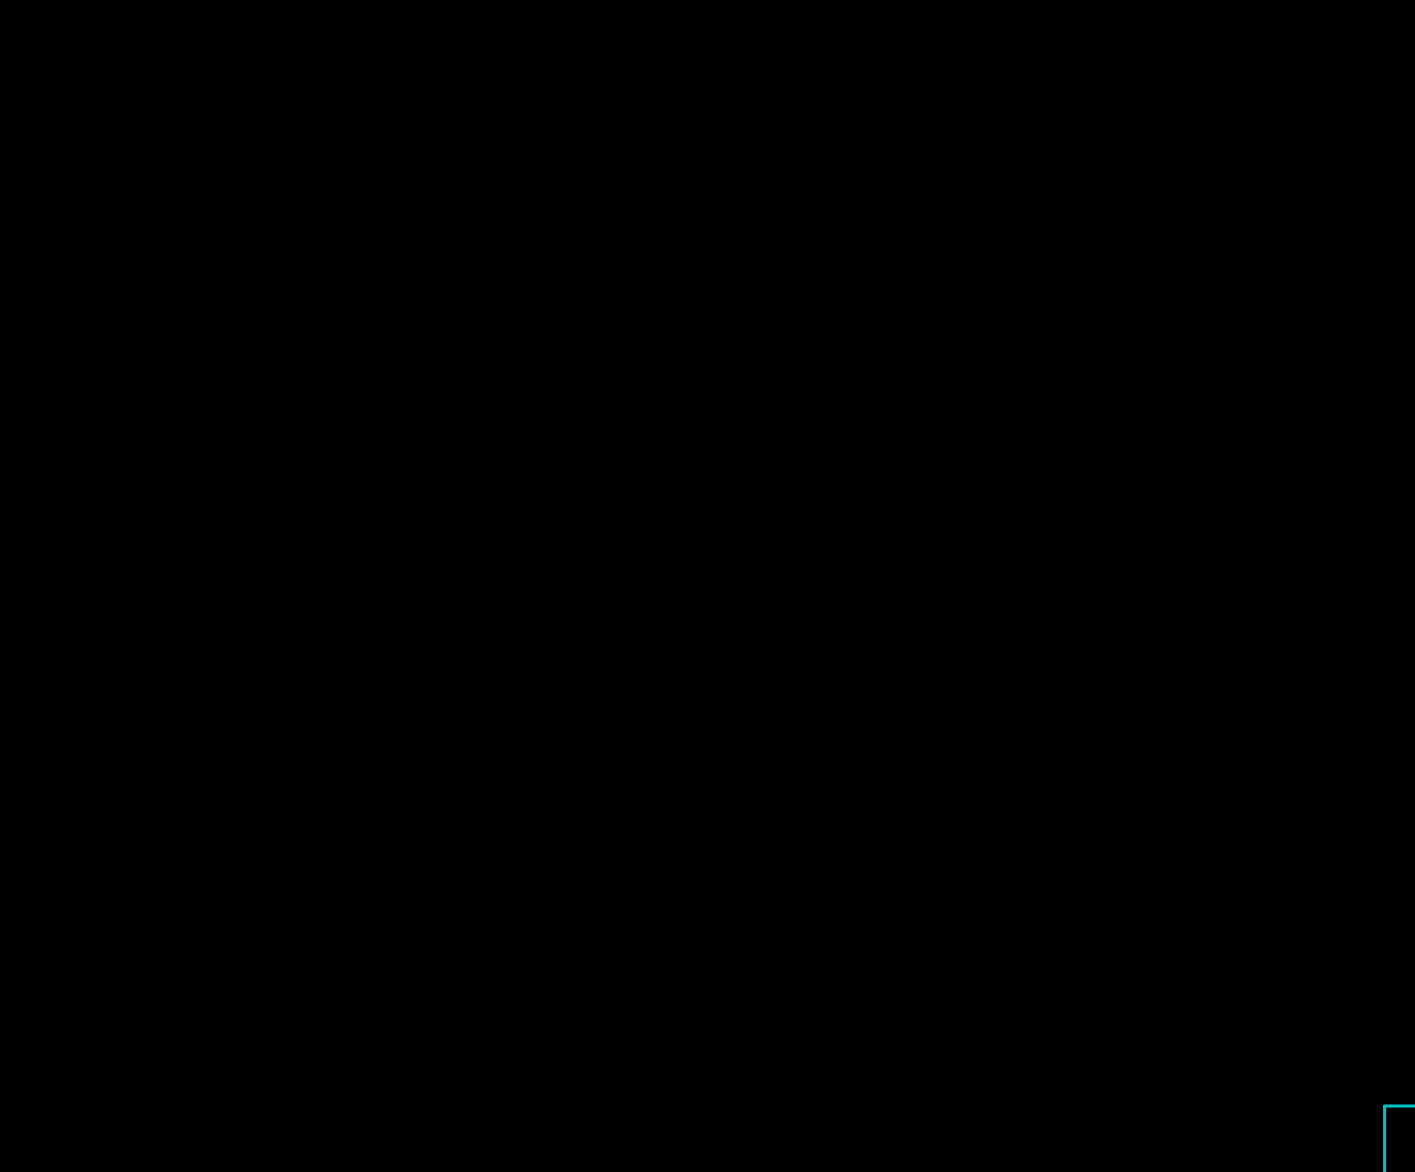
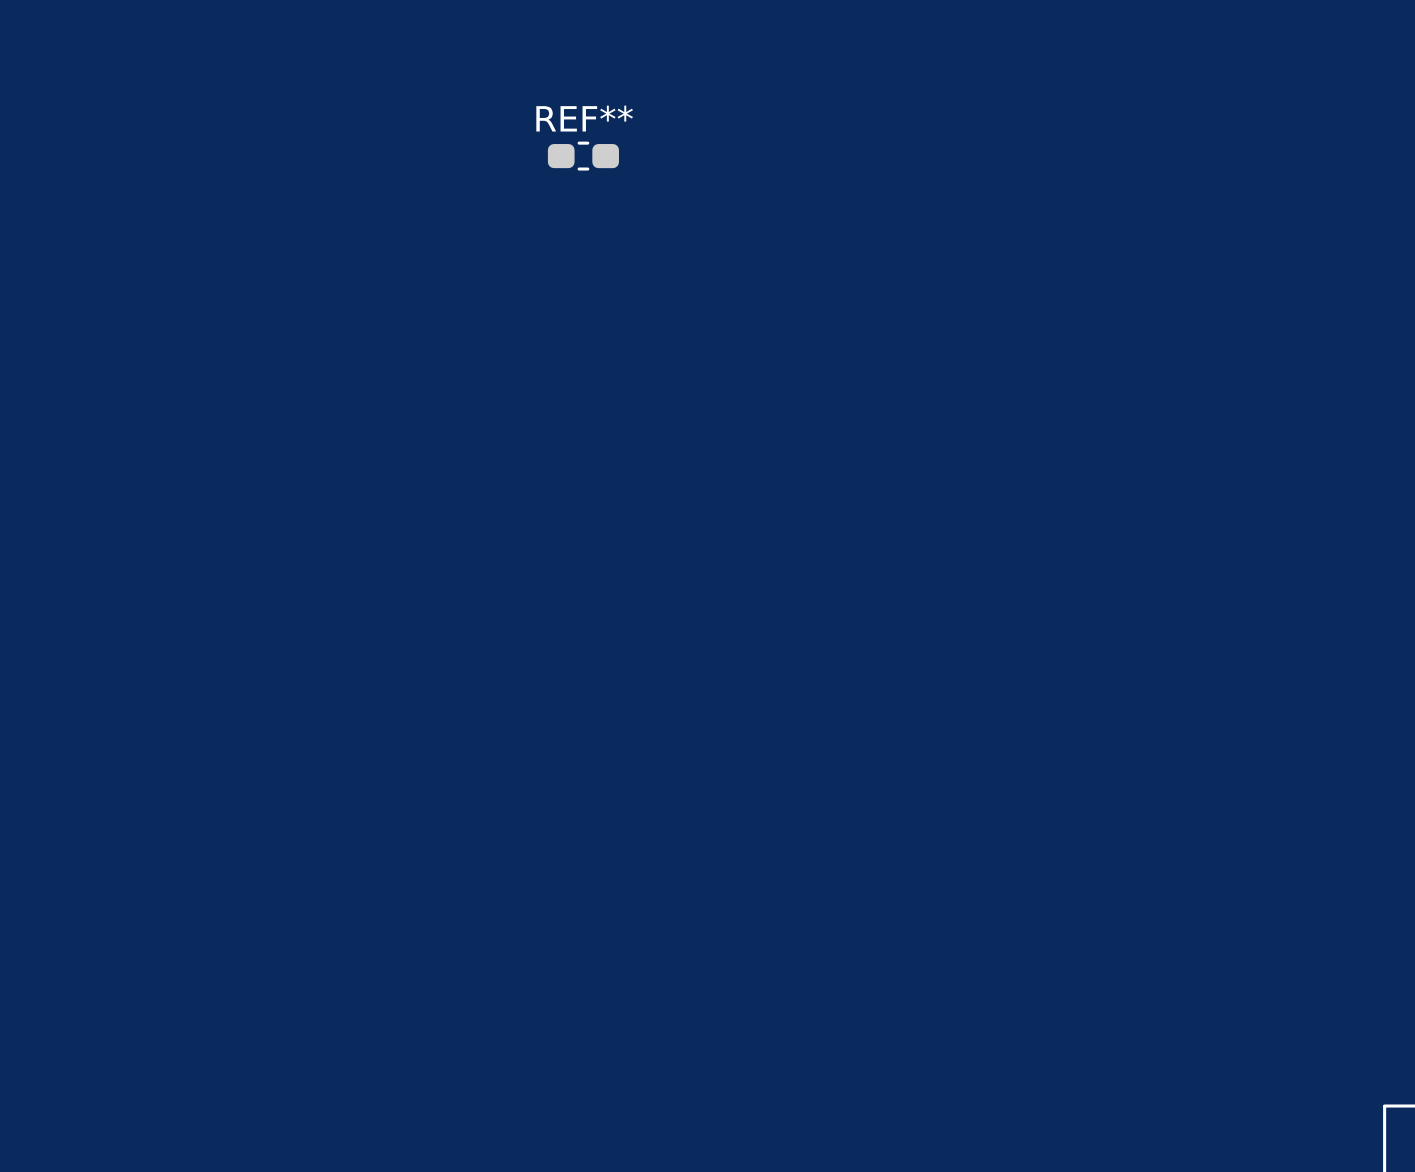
REF**: none -> (583, 156)

